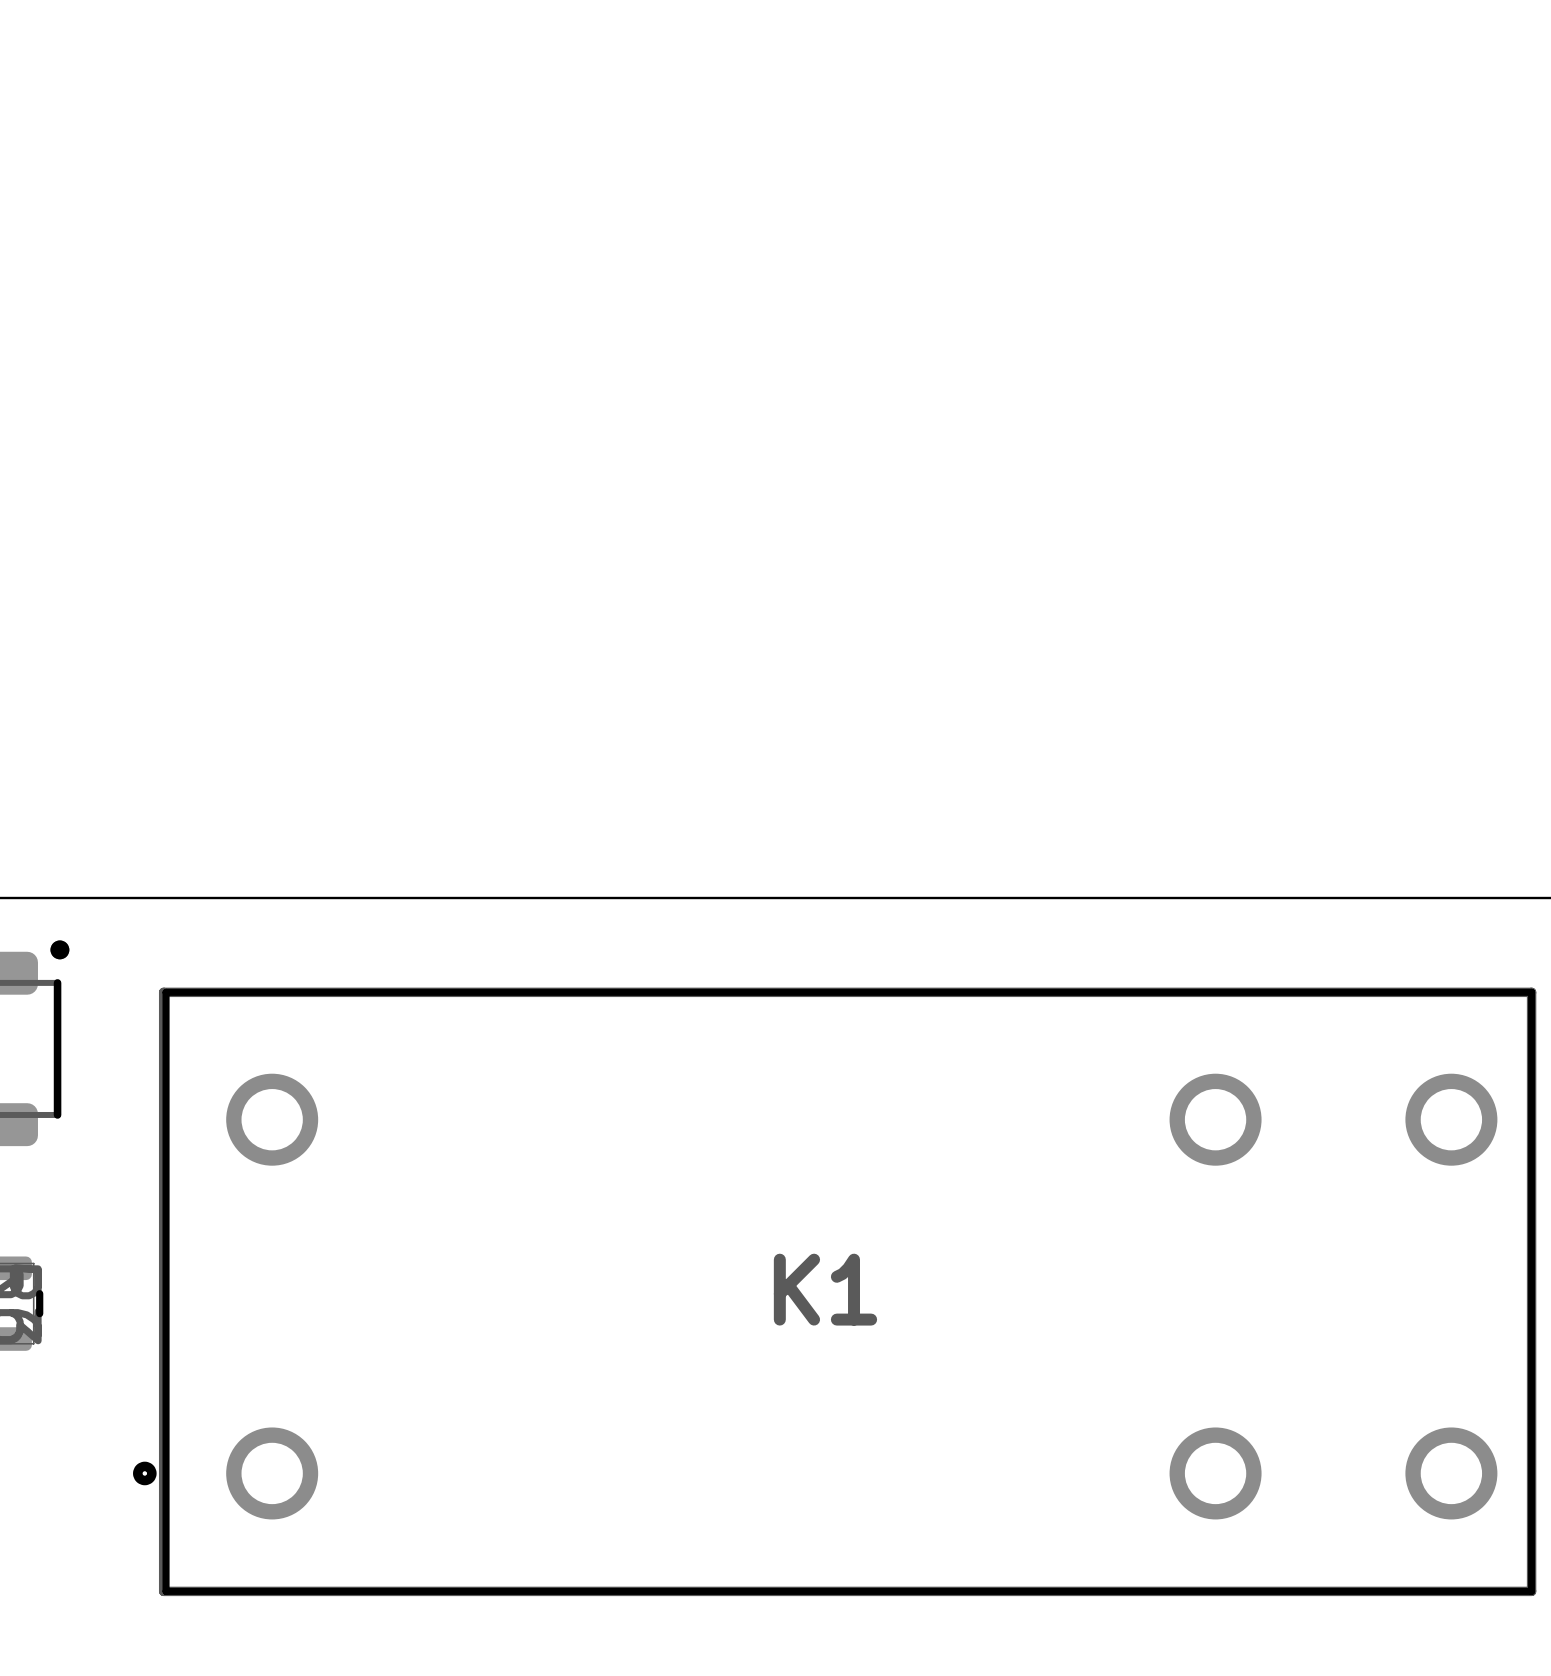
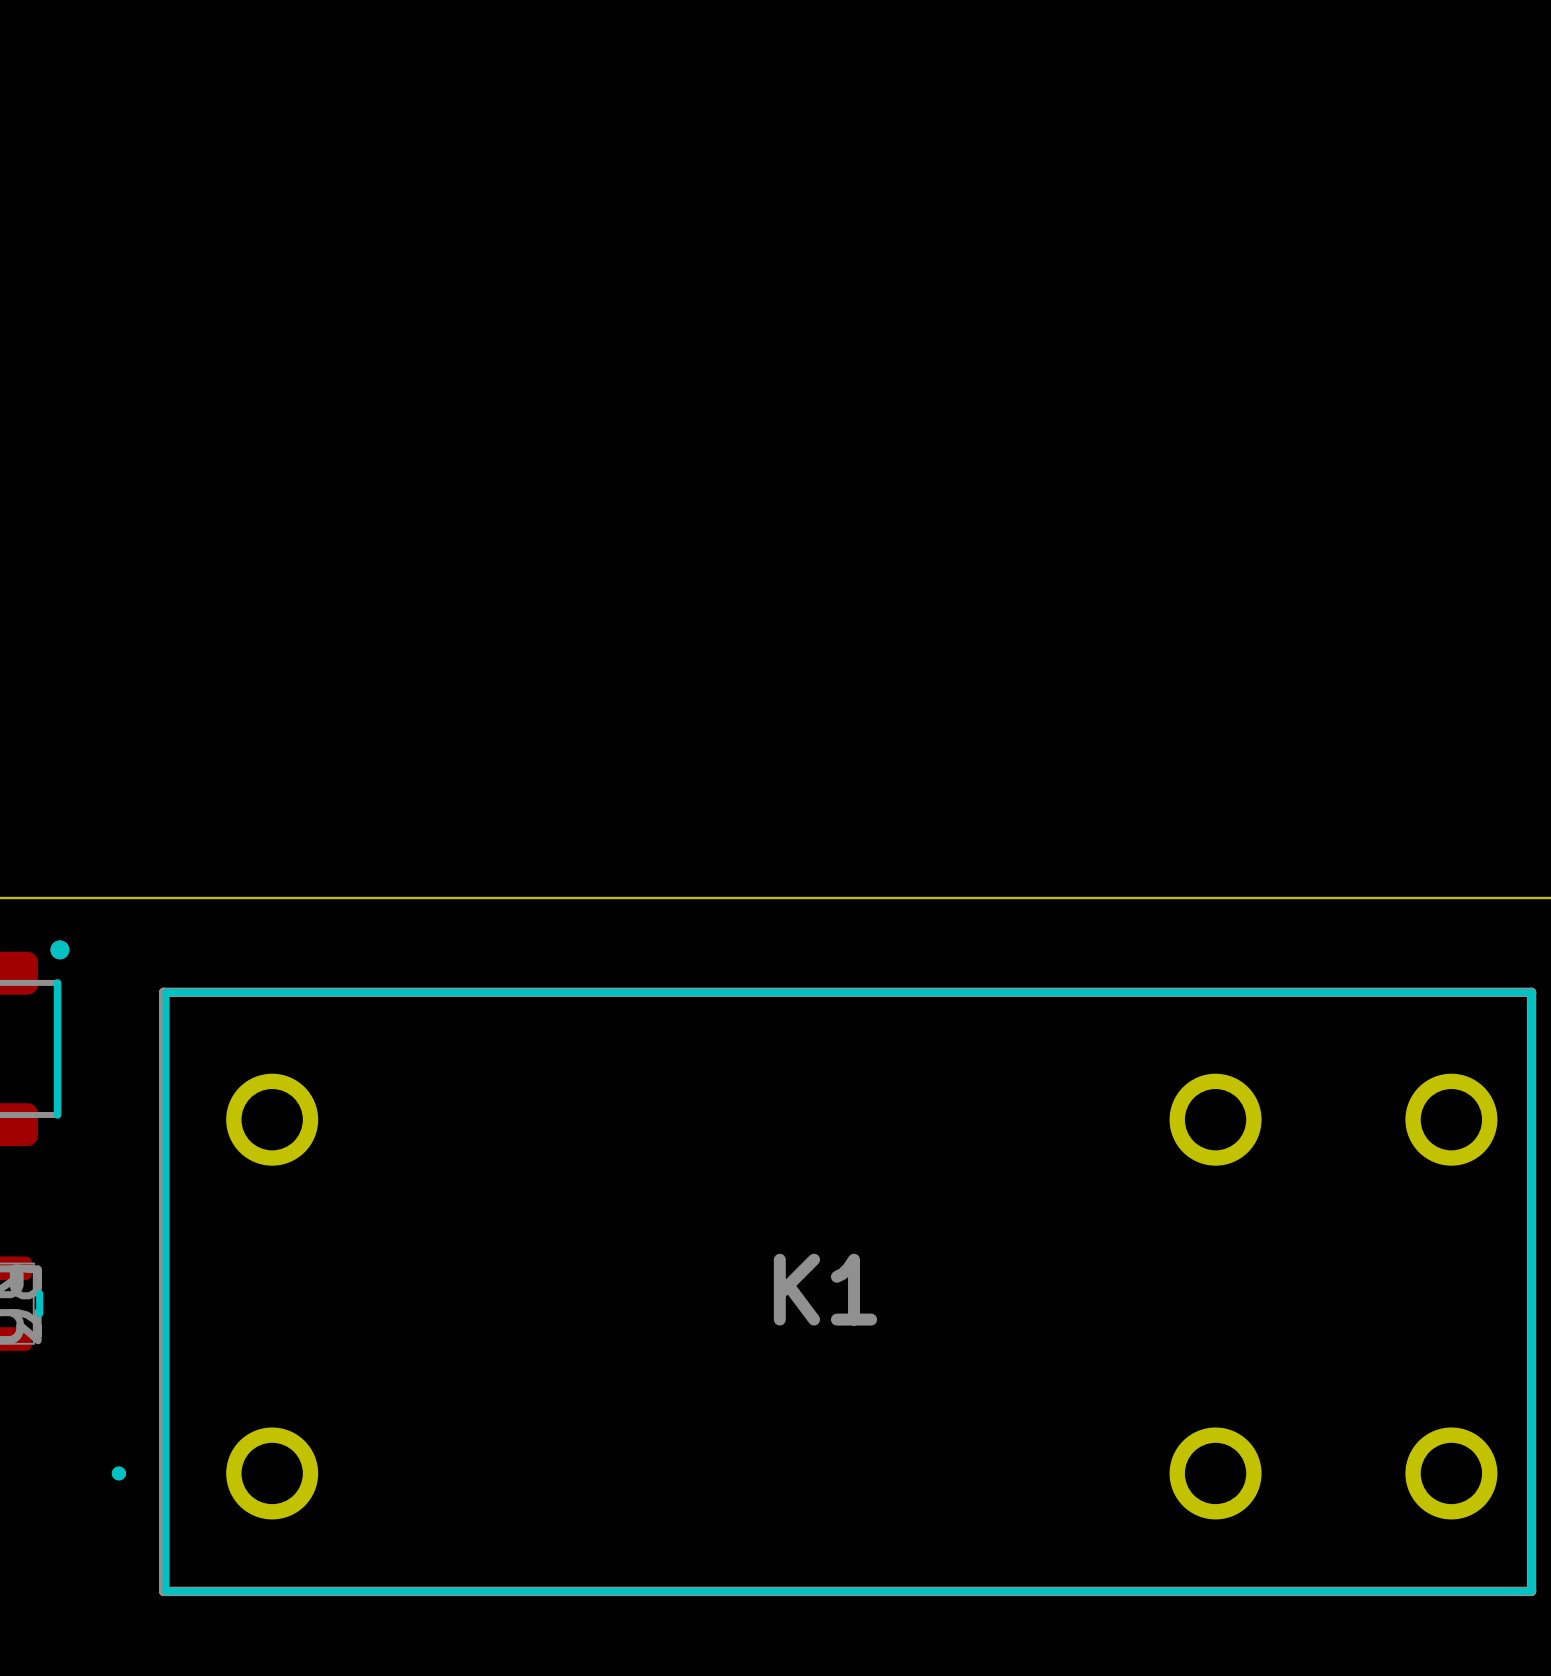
K1 footprint: [133, 987, 1537, 1597] -> [111, 987, 1537, 1597]

